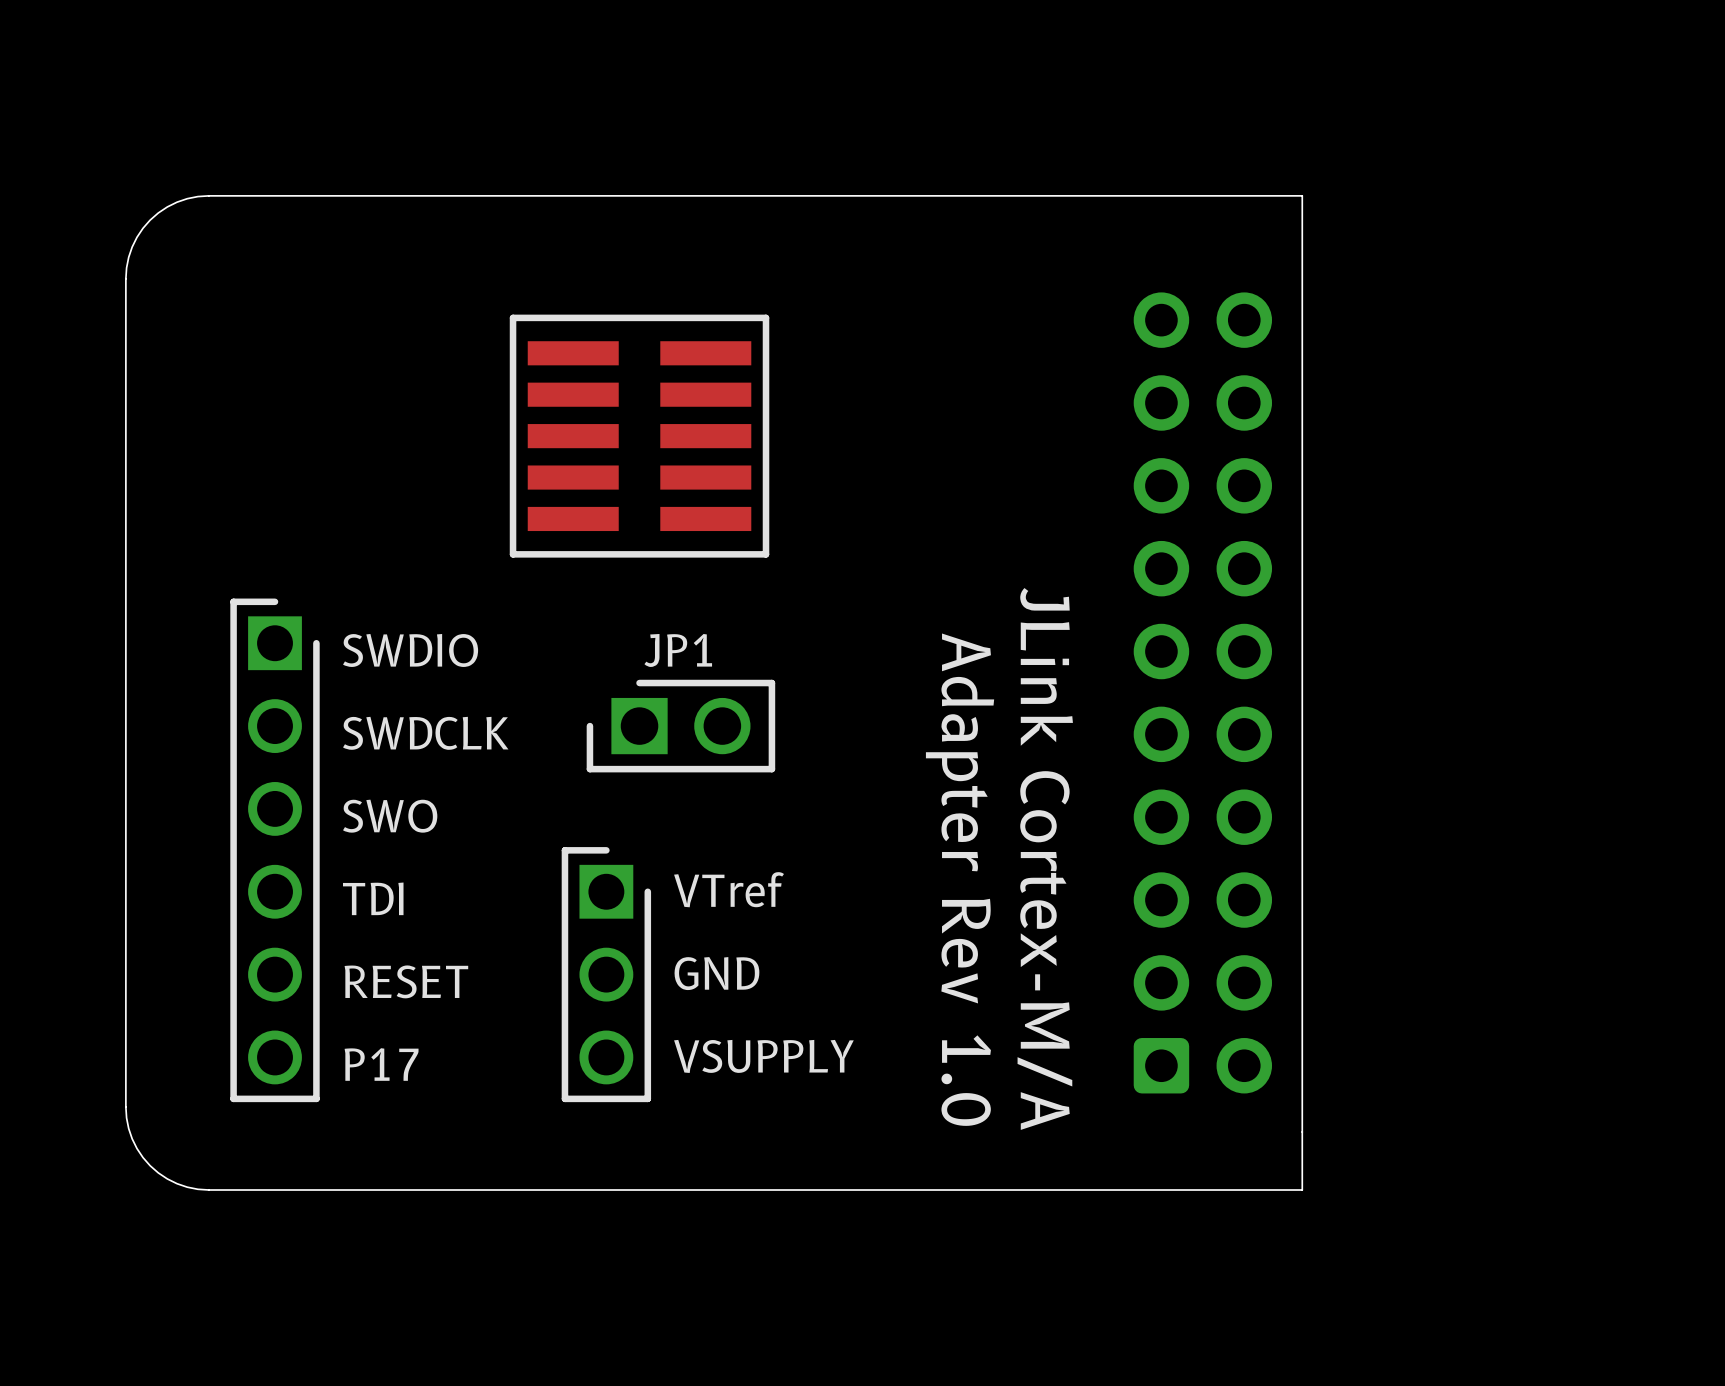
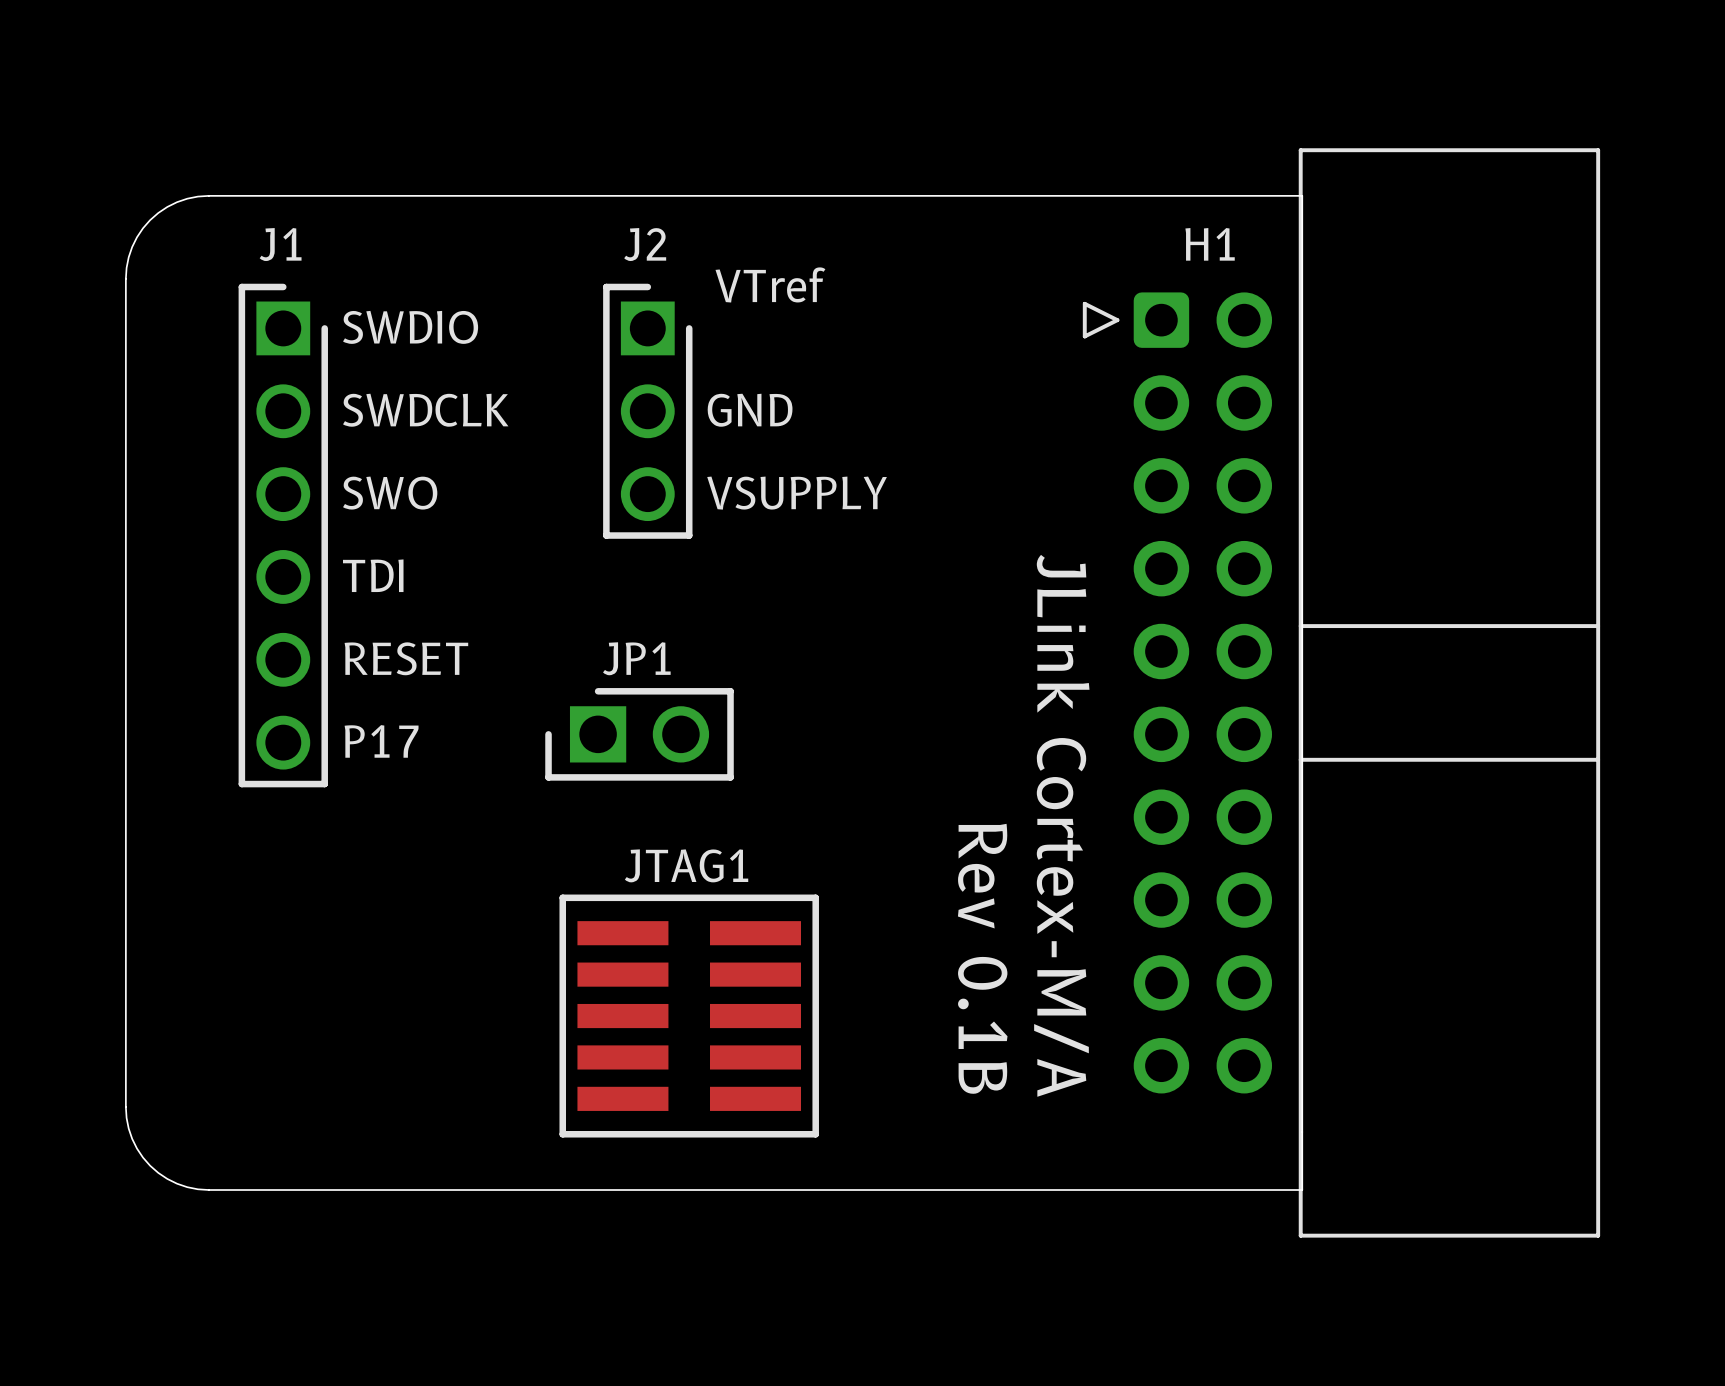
J2: none -> (647, 411)
part: (639, 436) -> none
J1: none -> (283, 535)
text position: SWDIO (410, 650) -> SWDIO (410, 327)
H1 side: bottom (1202, 692) -> top (1341, 692)
JP1 position: (680, 726) -> (639, 734)
text position: SWDCLK (425, 733) -> SWDCLK (425, 410)
text position: SWO (390, 816) -> SWO (390, 493)
part: (275, 850) -> none
text position: JLink Cortex-M/A (1045, 858) -> JLink Cortex-M/A (1061, 825)
text: Adapter Rev 1.0 (960, 879) -> none
text position: VTref (729, 889) -> VTref (770, 284)
text position: TDI (373, 898) -> TDI (373, 575)
text: none -> Rev 0.1B (982, 958)
text position: GND (716, 973) -> GND (750, 410)
part: (606, 974) -> none
text position: RESET (406, 981) -> RESET (406, 658)
JTAG1: none -> (689, 1016)
text position: VSUPPLY (763, 1056) -> VSUPPLY (797, 493)
text position: P17 (381, 1064) -> P17 (381, 741)

